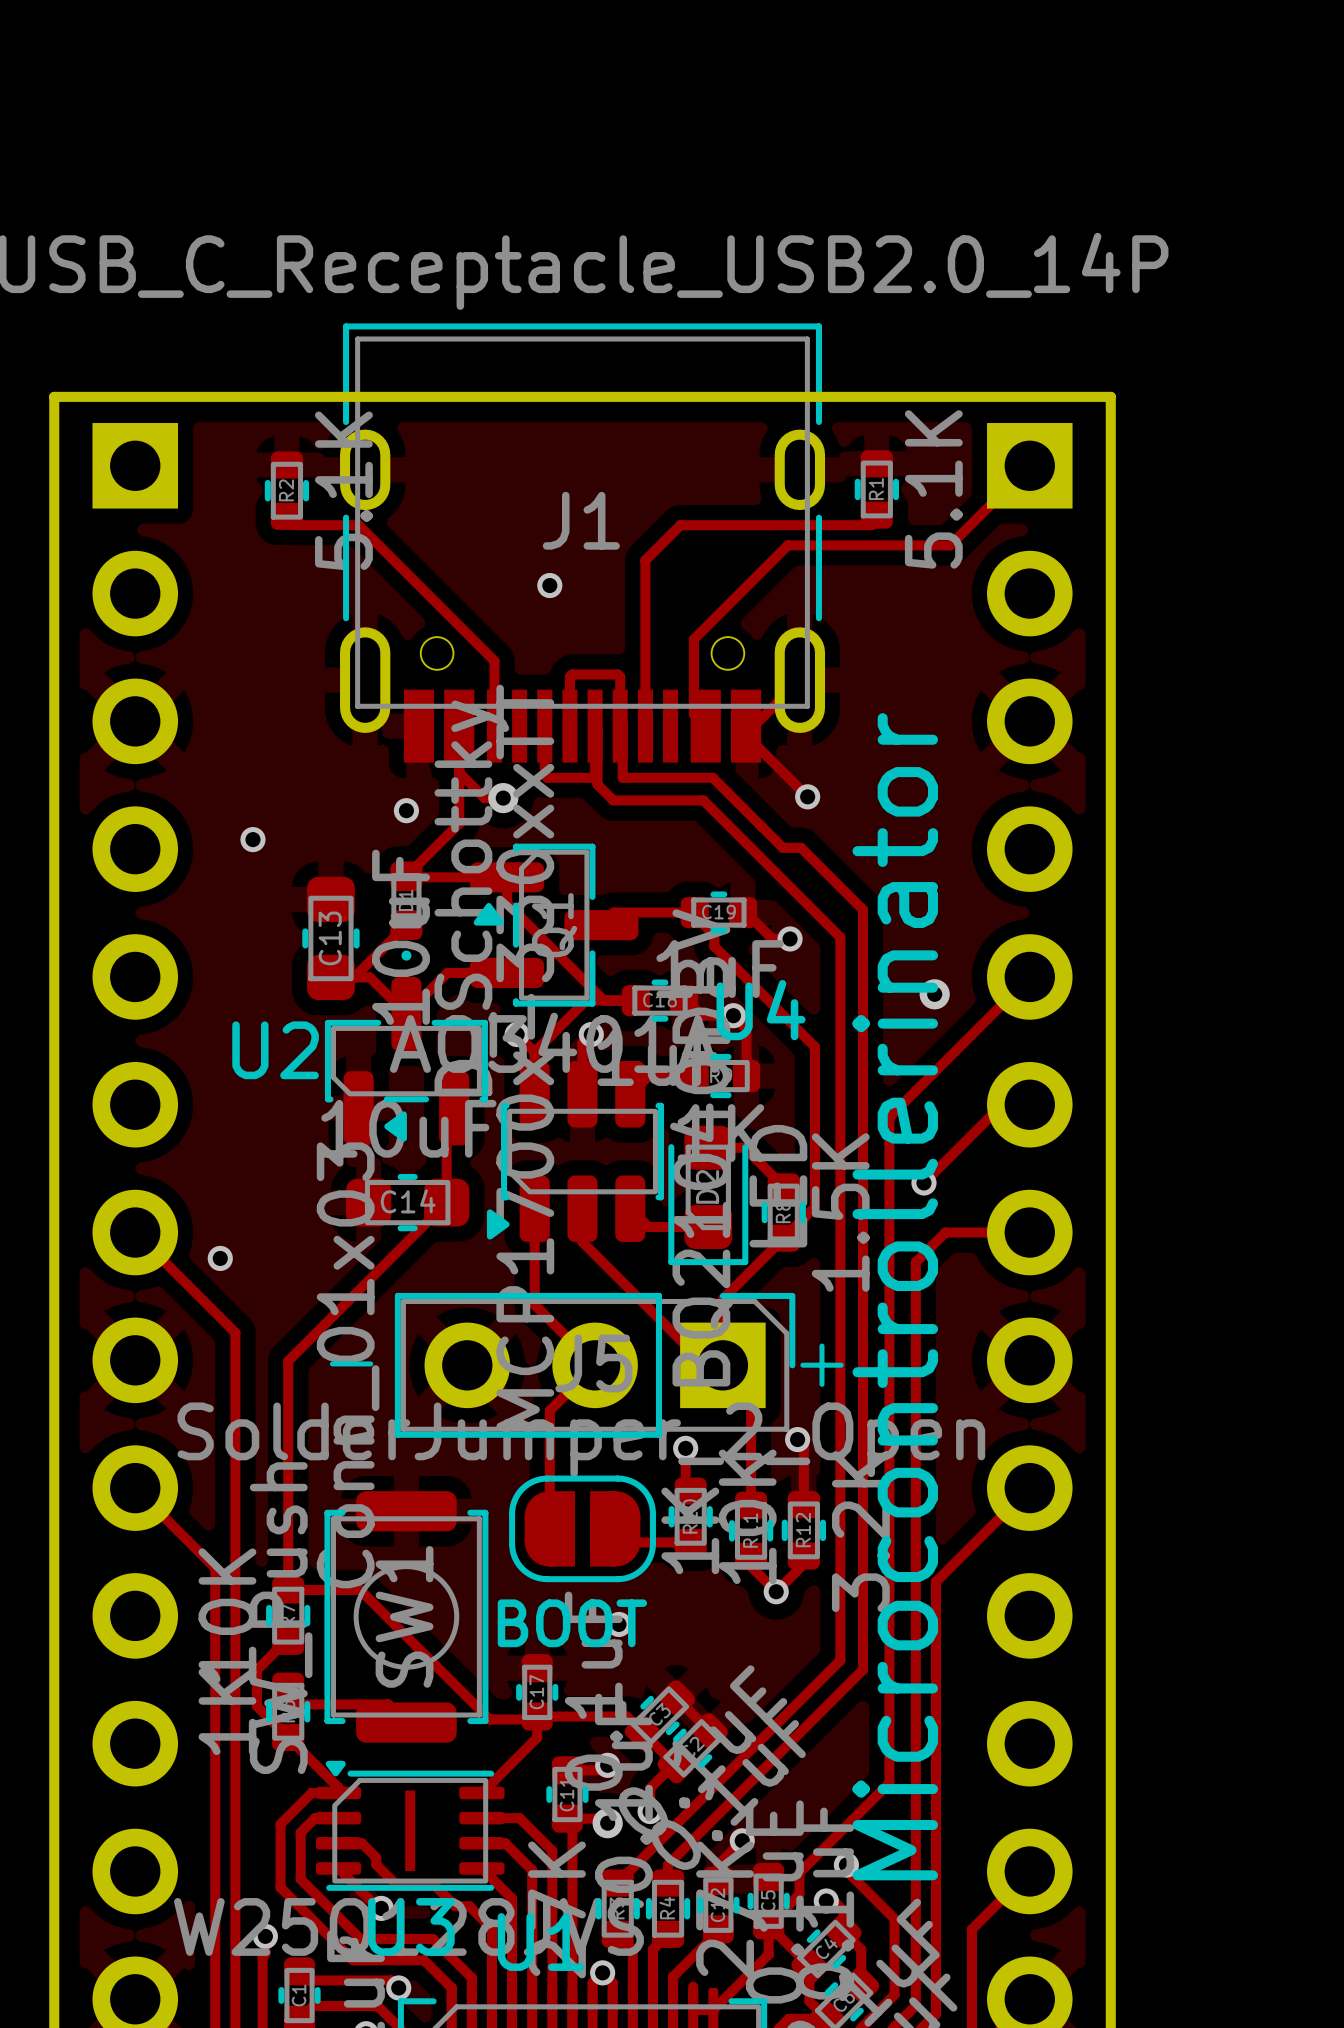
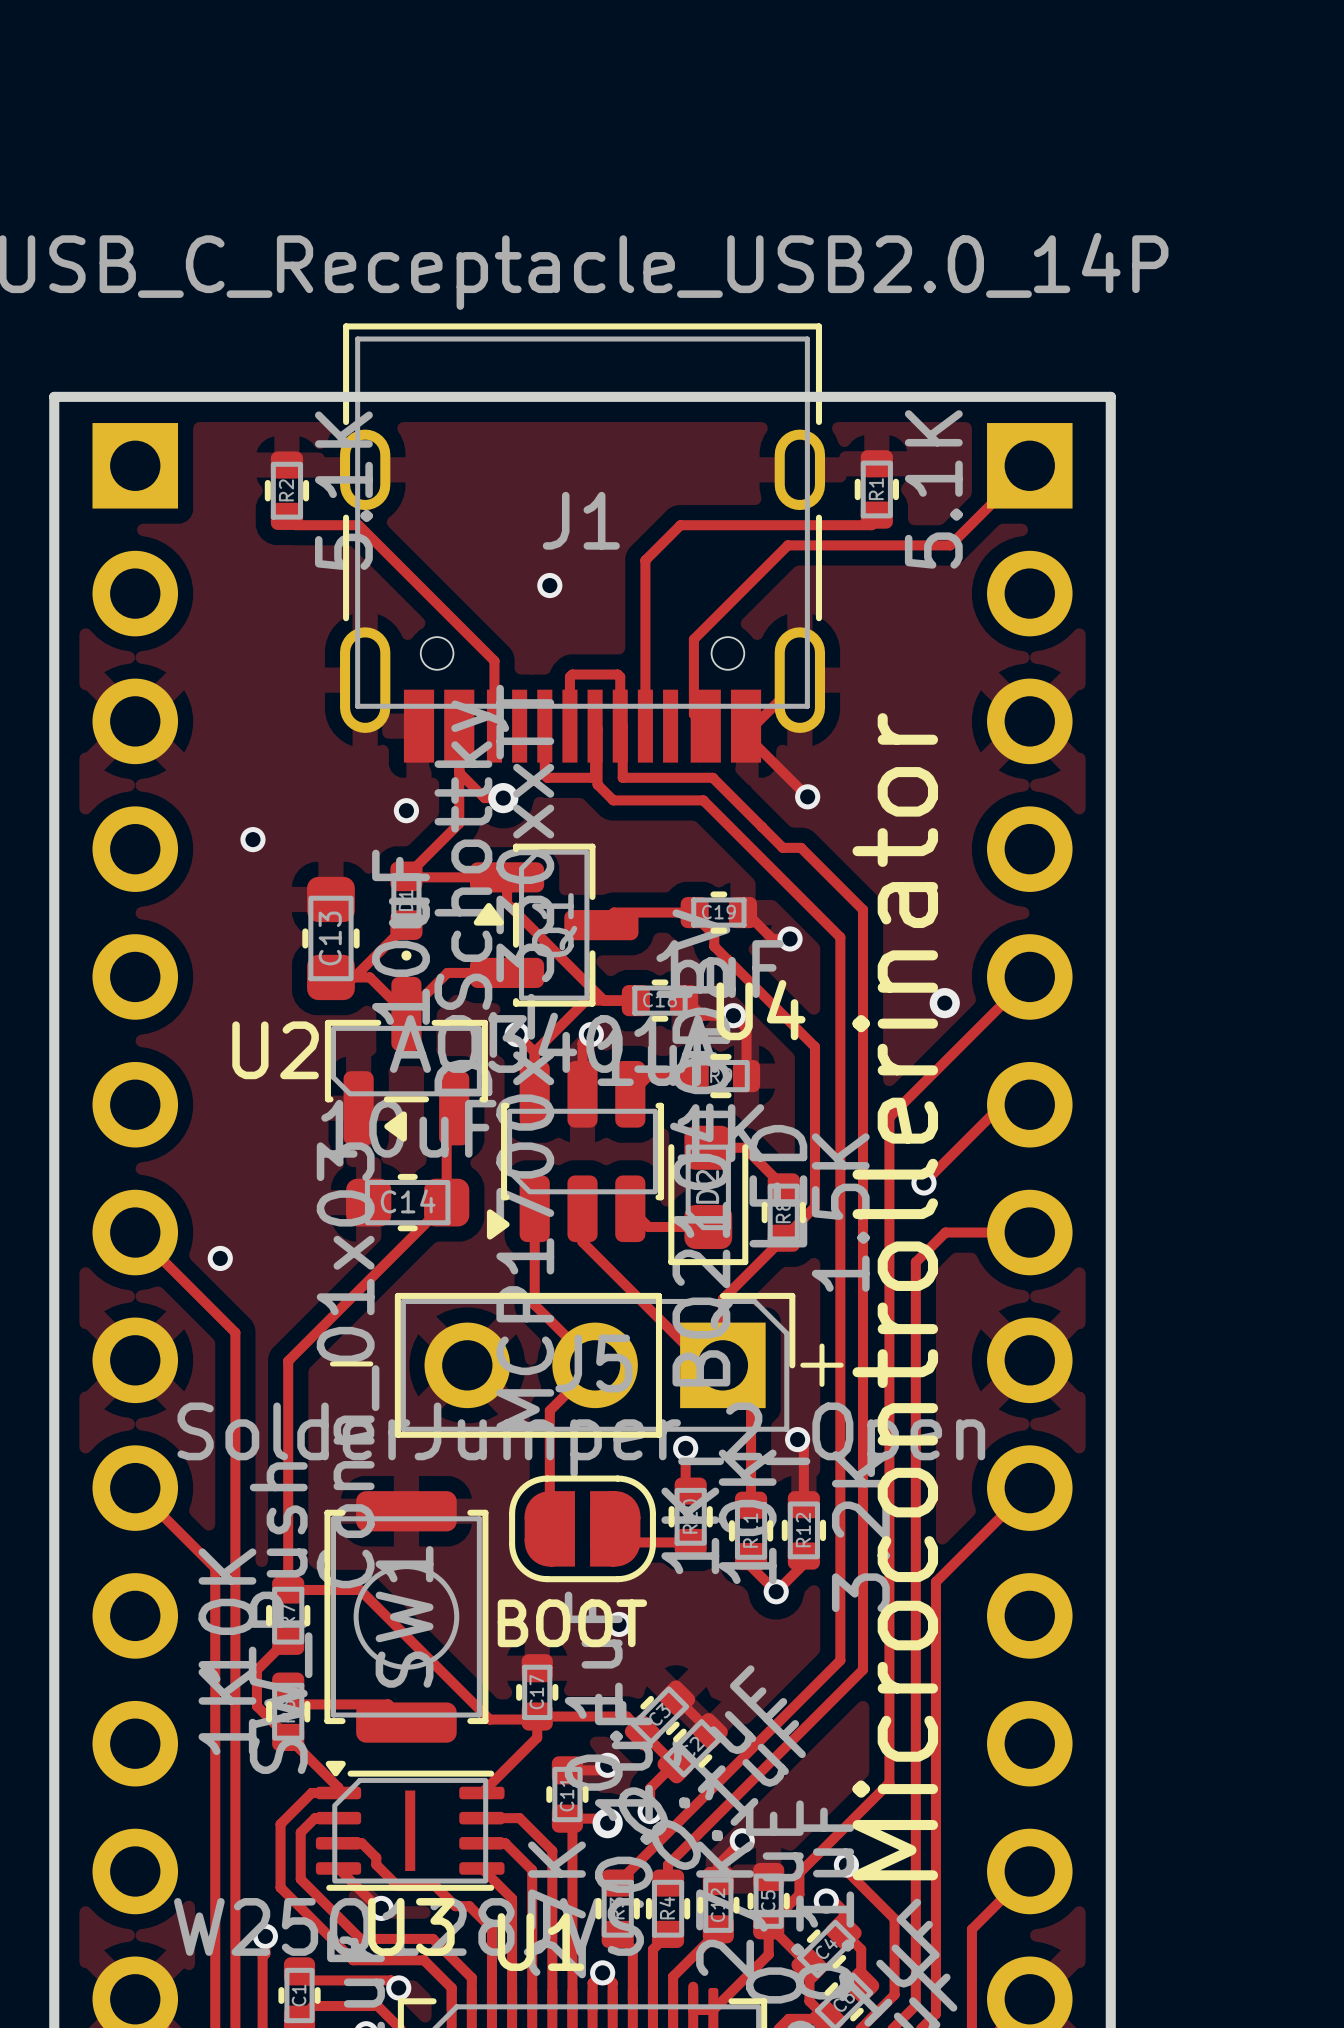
via position: (934, 994) -> (944, 1003)

